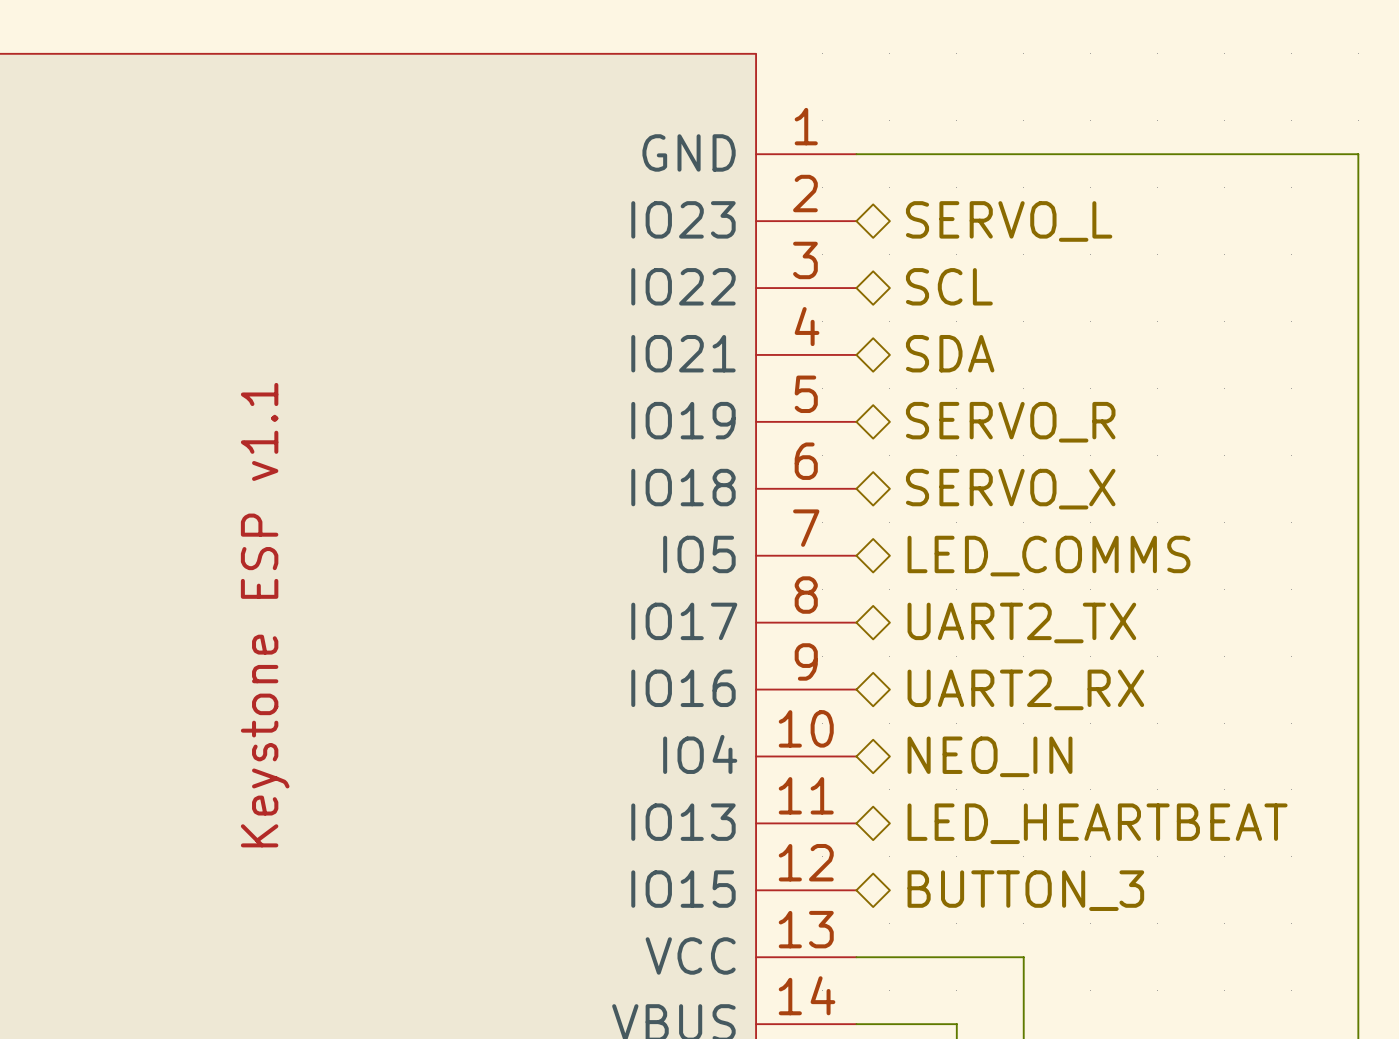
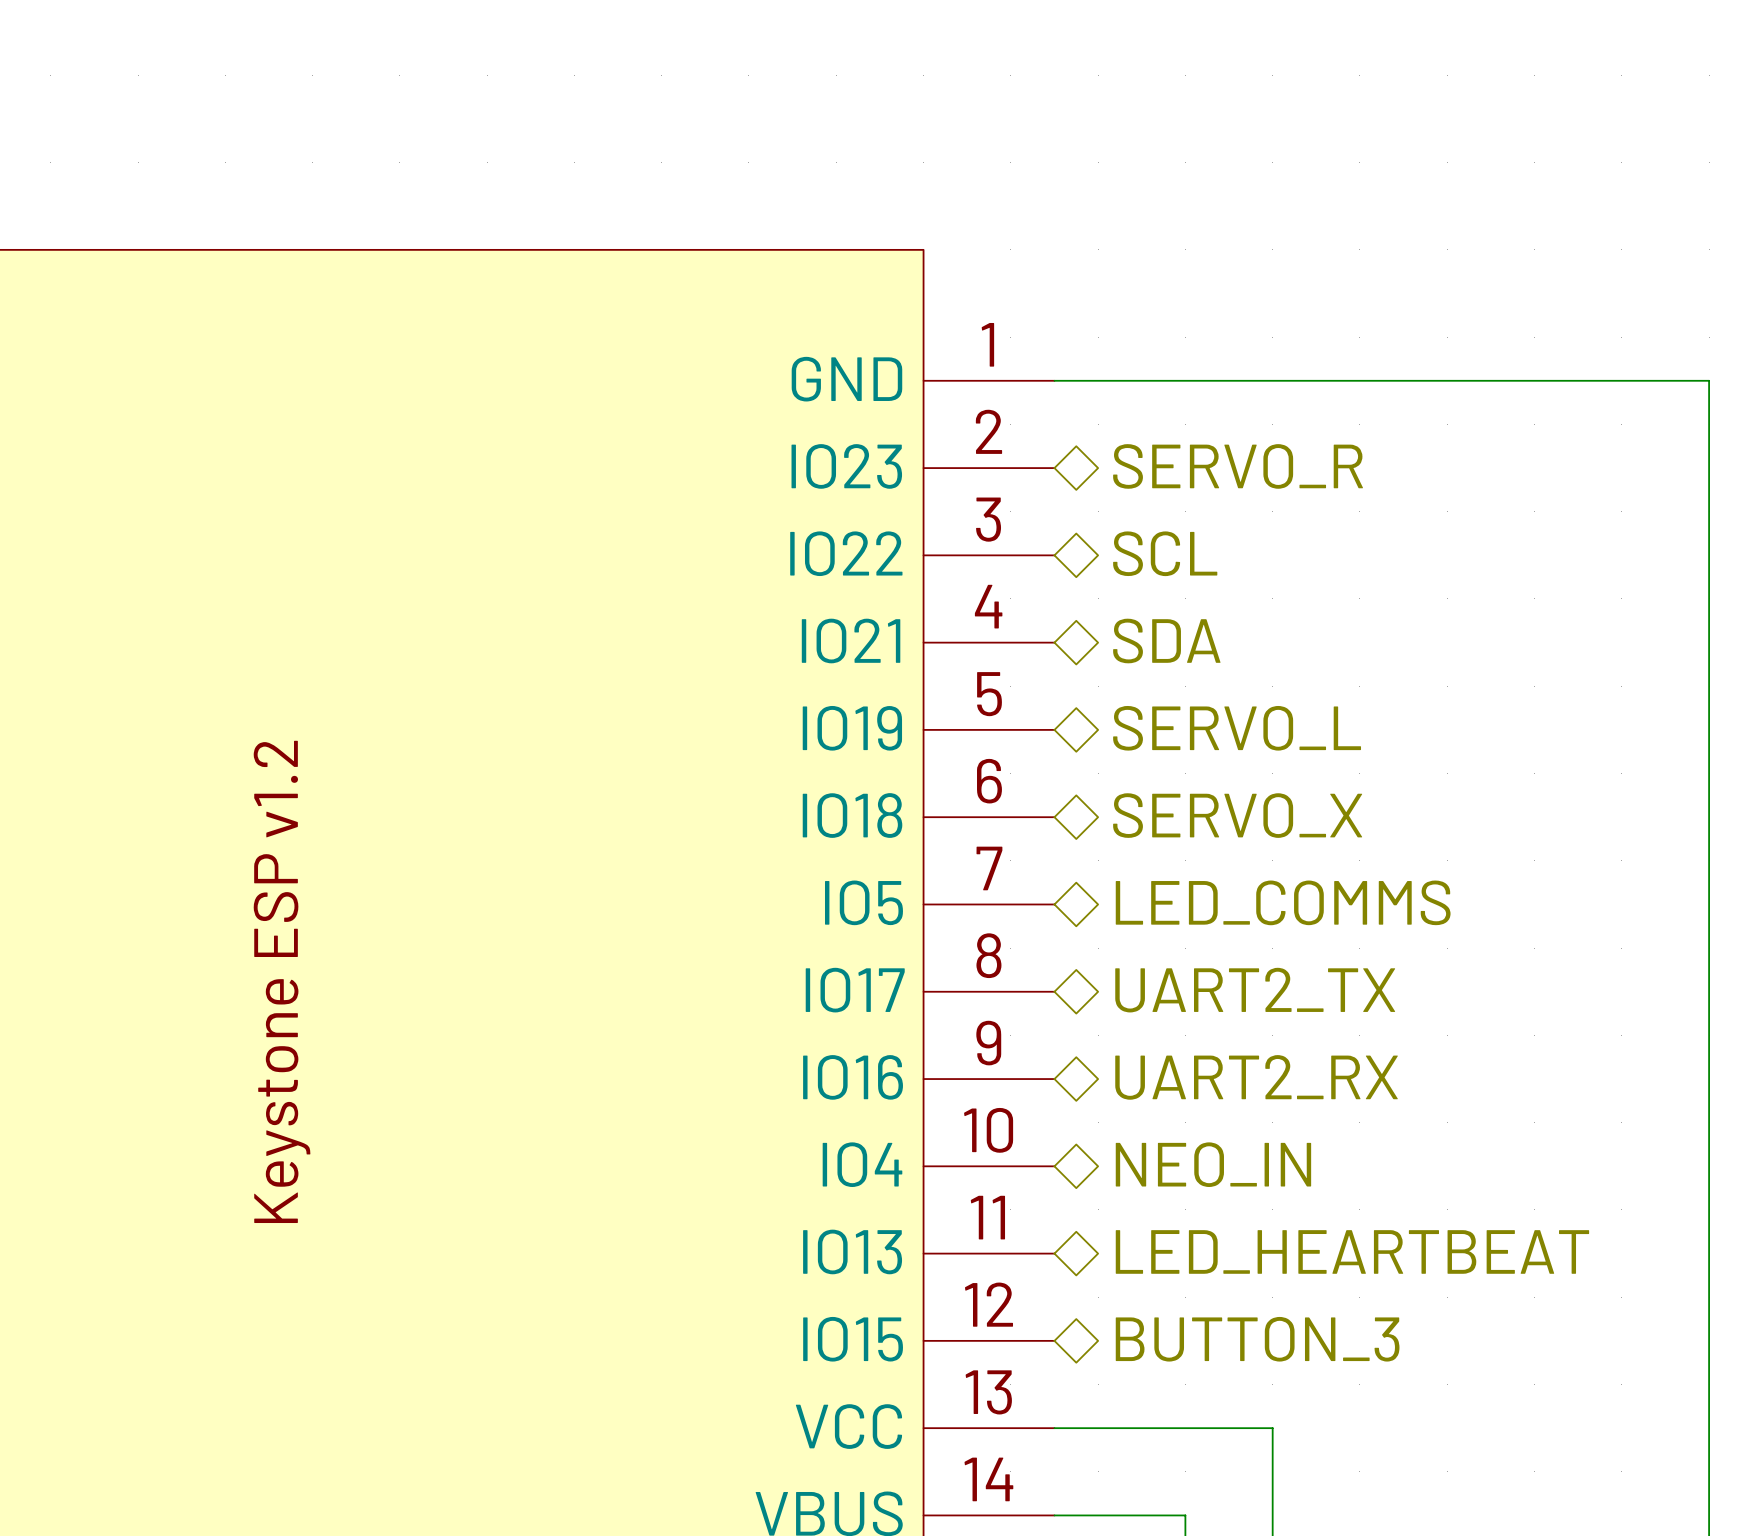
hierarchical label: SERVO_L (1009, 221) -> SERVO_R (1238, 466)
hierarchical label: SERVO_R (1010, 422) -> SERVO_L (1237, 728)
part text: Keystone ESP v1.1 (265, 615) -> Keystone ESP v1.2 (282, 981)

